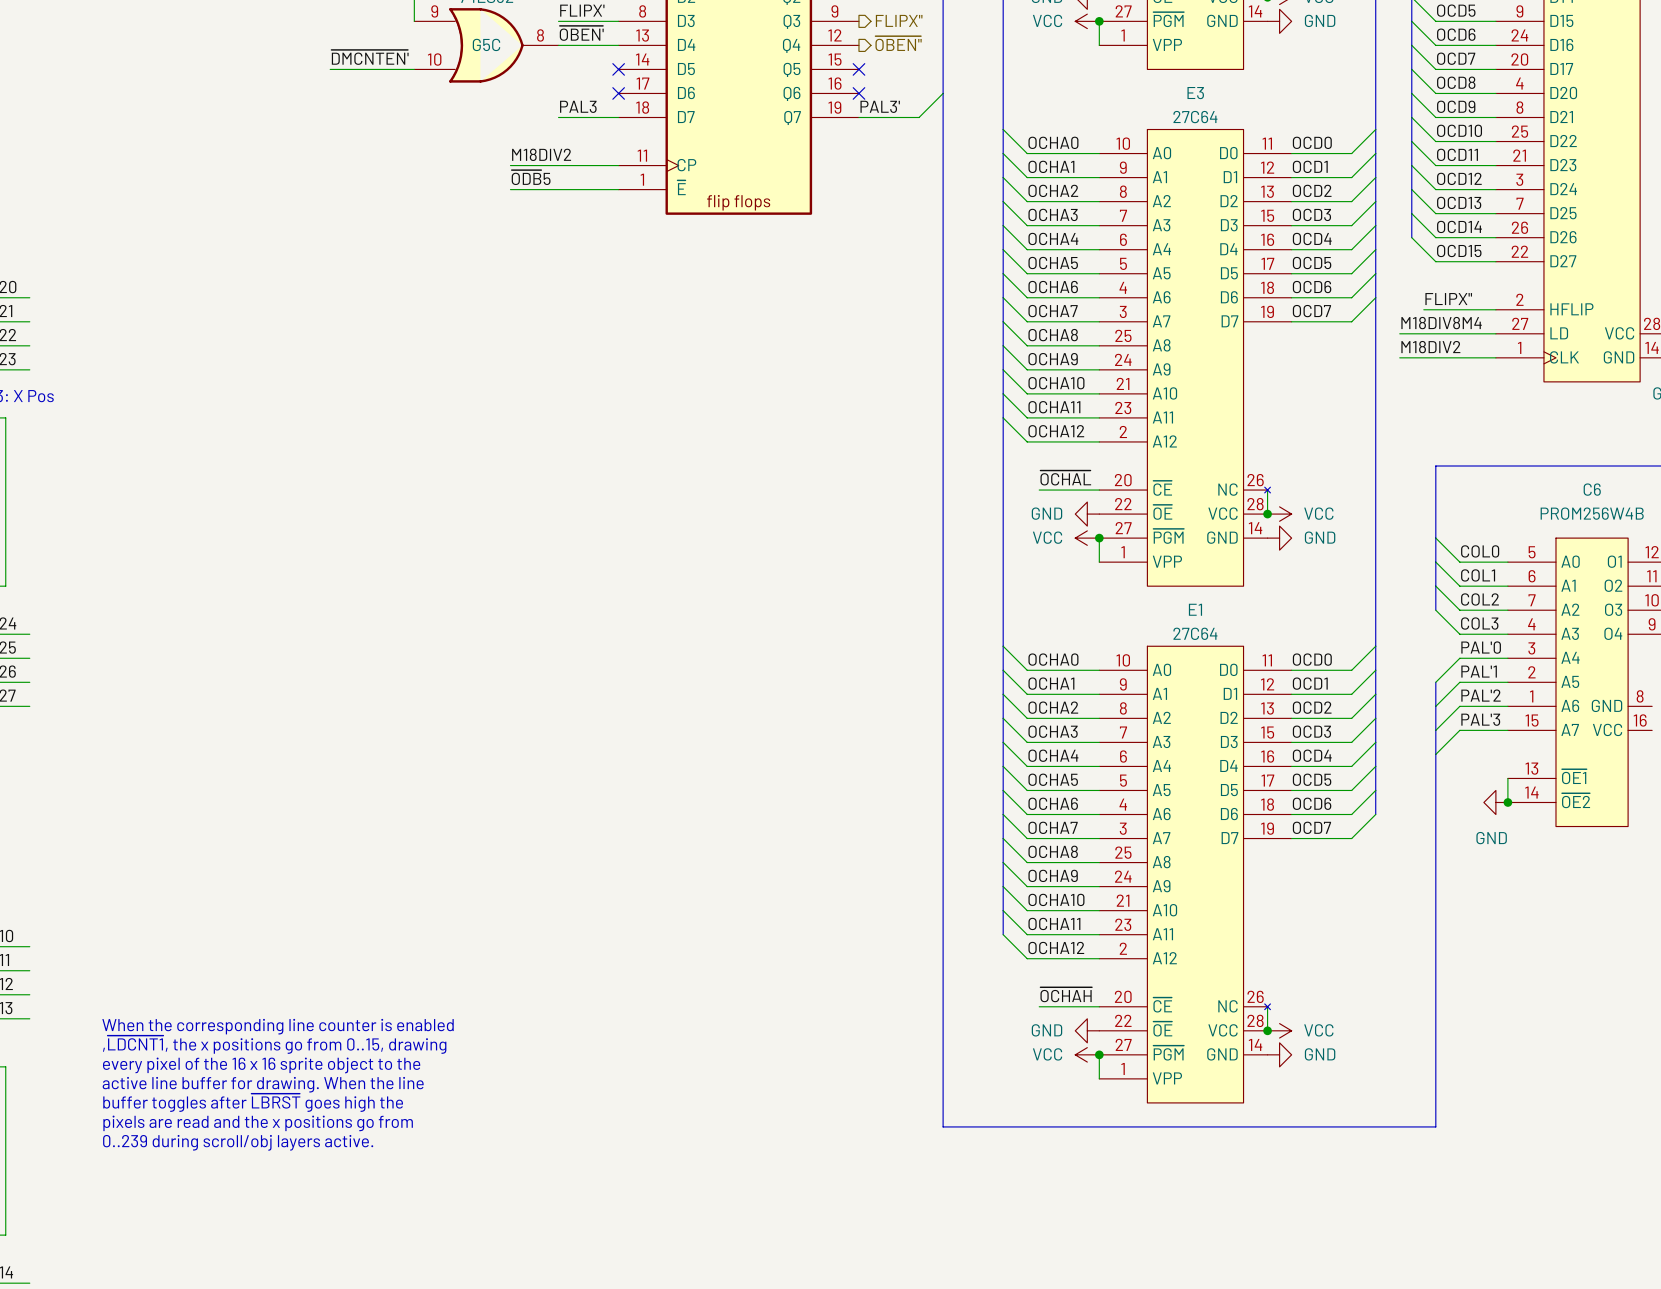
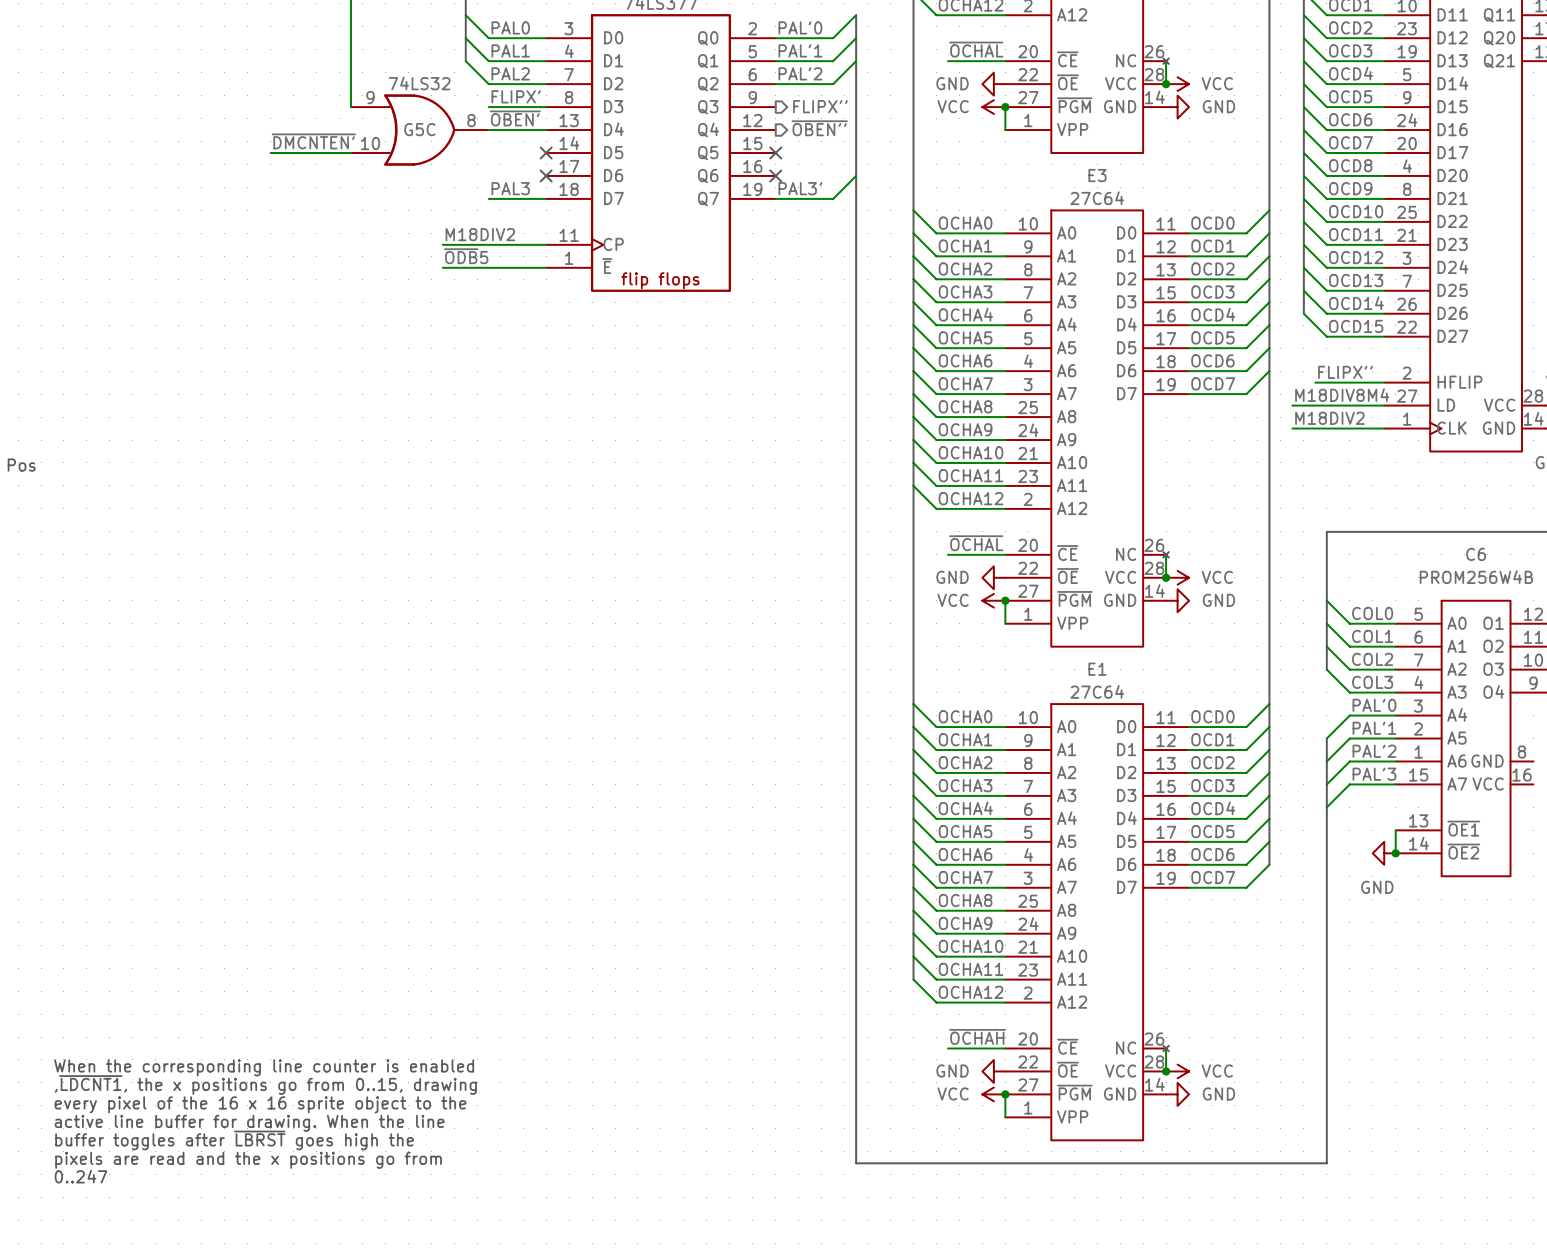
text: 0..239 during scroll/obj layers active. (238, 1142) -> 0..247 (80, 1176)

